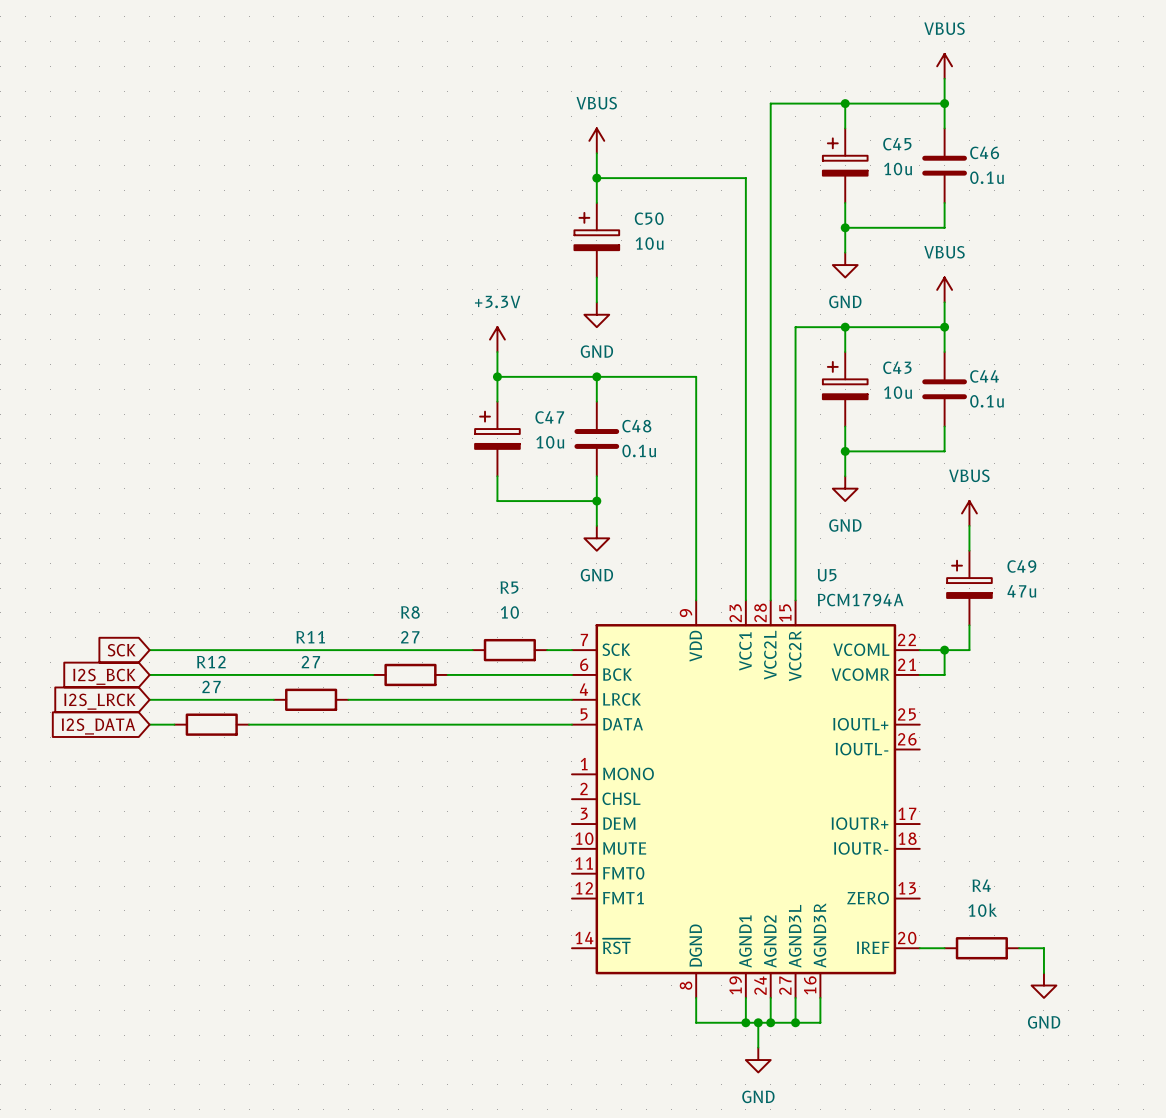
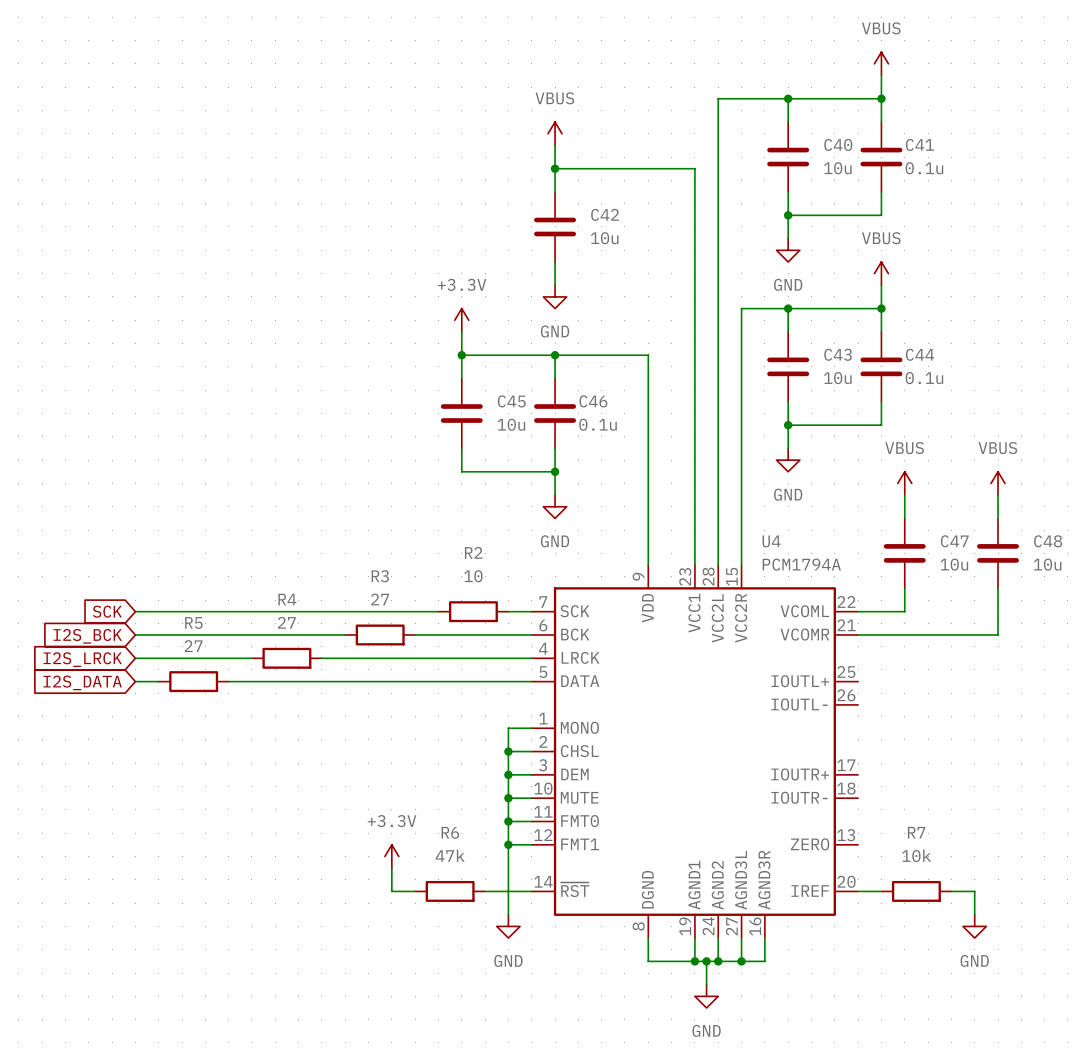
C45 symbol: [822, 128, 868, 203] -> [440, 378, 483, 449]
C46 name: C46 (984, 152) -> C41 (919, 144)
C40: none -> 10u (788, 157)
C50: 10u (596, 240) -> none
C42: none -> 10u (555, 226)
C43 symbol: [822, 352, 868, 427] -> [767, 331, 810, 402]
C47 symbol: [475, 401, 520, 477] -> [883, 518, 926, 589]
C48 name: C48 (636, 426) -> C46 (593, 401)
power symbol: none -> VBUS (998, 483)
wire: none -> (998, 495) (998, 518)
U5 name: U5 (827, 575) -> U4 (771, 541)
R5 name: R5 (509, 587) -> R2 (473, 552)
C49: 47u (969, 588) -> none
C48: none -> 10u (998, 553)
R8 name: R8 (410, 612) -> R3 (380, 576)
R11 name: R11 (310, 637) -> R4 (287, 599)
wire: (944, 650) (944, 674) -> (998, 588) (998, 634) (881, 634)
junction: (944, 650) -> none
R12 name: R12 (211, 662) -> R5 (193, 623)
wire: none -> (531, 728) (508, 728) (508, 914)
wire: none -> (508, 751) (531, 751)
junction: none -> (508, 751)
wire: none -> (508, 774) (531, 774)
junction: none -> (508, 774)
wire: none -> (508, 798) (531, 798)
junction: none -> (508, 798)
wire: none -> (508, 821) (531, 821)
junction: none -> (508, 821)
R4 name: R4 (981, 885) -> R7 (916, 832)
wire: none -> (508, 844) (531, 844)
junction: none -> (508, 844)
power symbol: none -> +3.3V (391, 856)
wire: none -> (391, 868) (391, 891) (415, 891)
R6: none -> 47k (450, 891)
wire: none -> (485, 891) (531, 891)
power symbol: none -> GND (508, 926)

